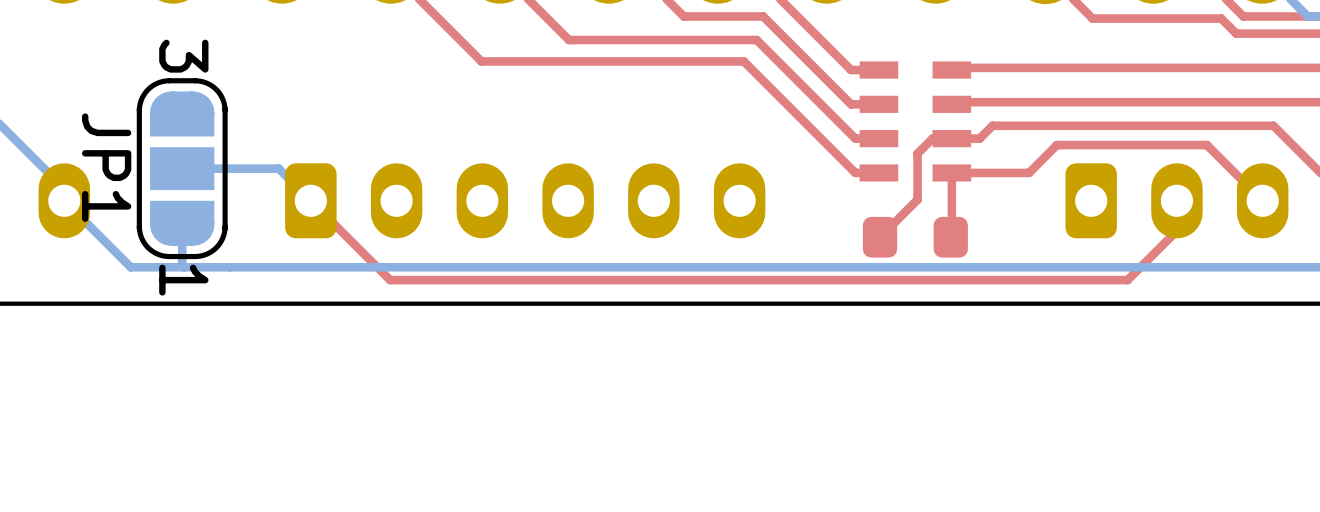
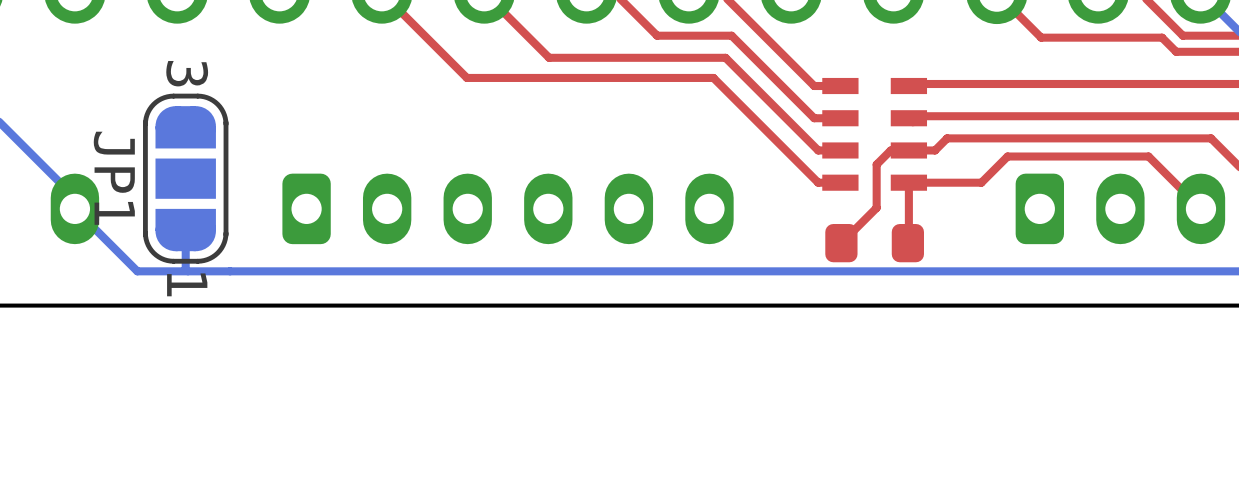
bottom track: (182, 168) (278, 168) (310, 200) -> none
top track: (1176, 200) (1176, 230) (1127, 280) (390, 280) (310, 200) -> none

